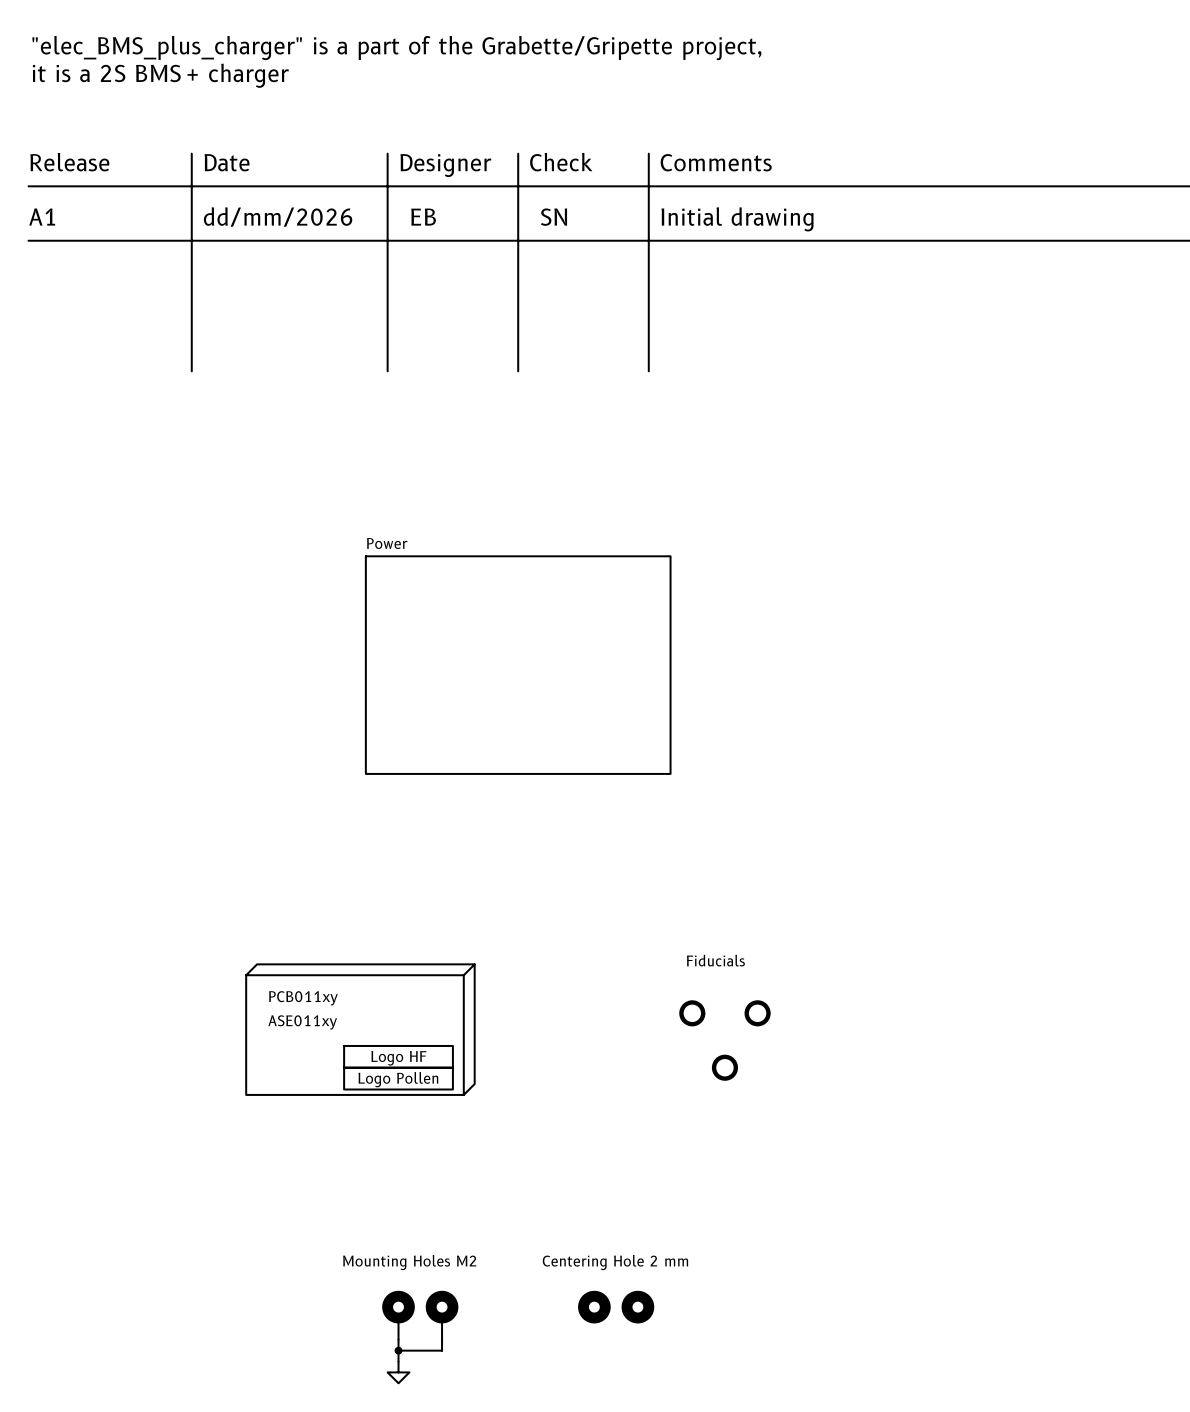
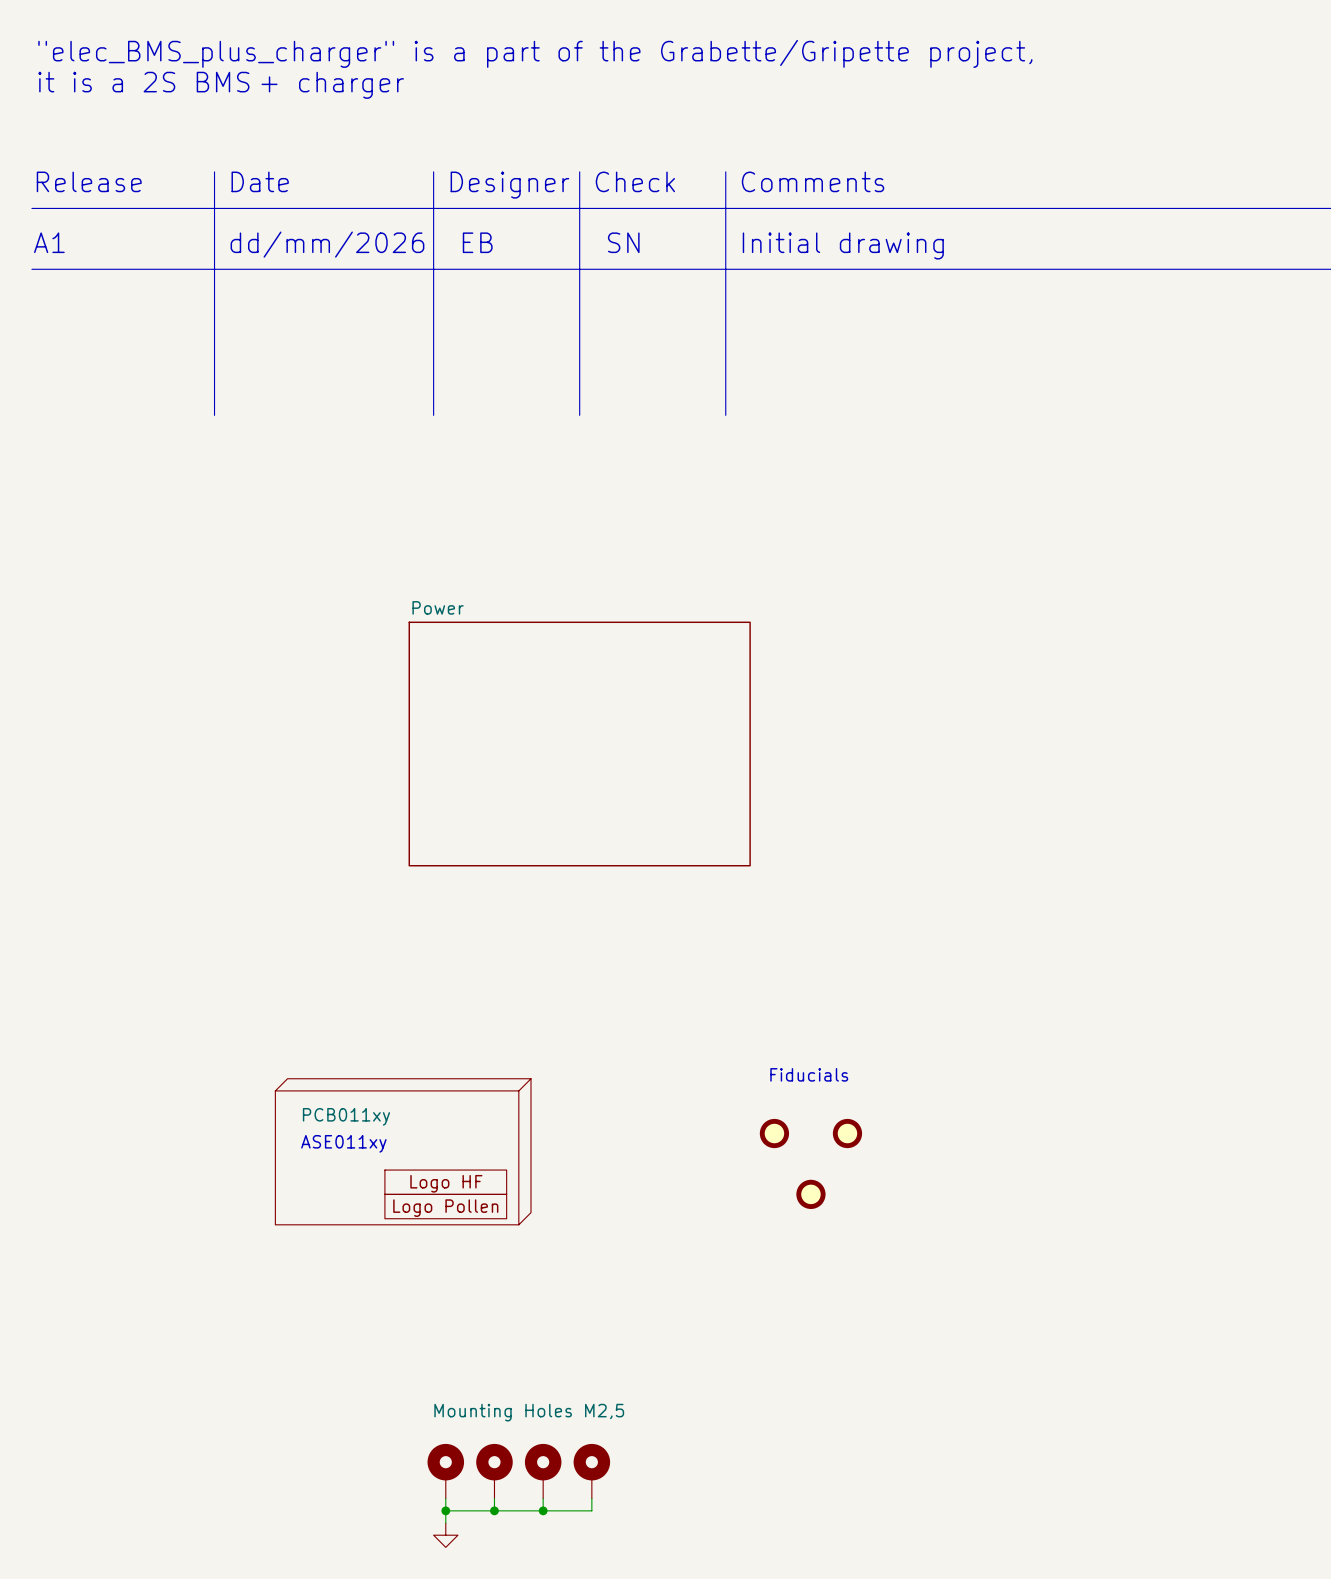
part value: Mounting Holes M2 (409, 1262) -> Mounting Holes M2,5 (529, 1412)
part: Centering Hole 2 mm (594, 1307) -> none
part: (637, 1307) -> none
part: none -> (543, 1471)
part: none -> (591, 1471)
wire: none -> (543, 1498) (543, 1510)
wire: none -> (591, 1498) (591, 1510) (494, 1510)
junction: none -> (494, 1510)
junction: none -> (543, 1510)

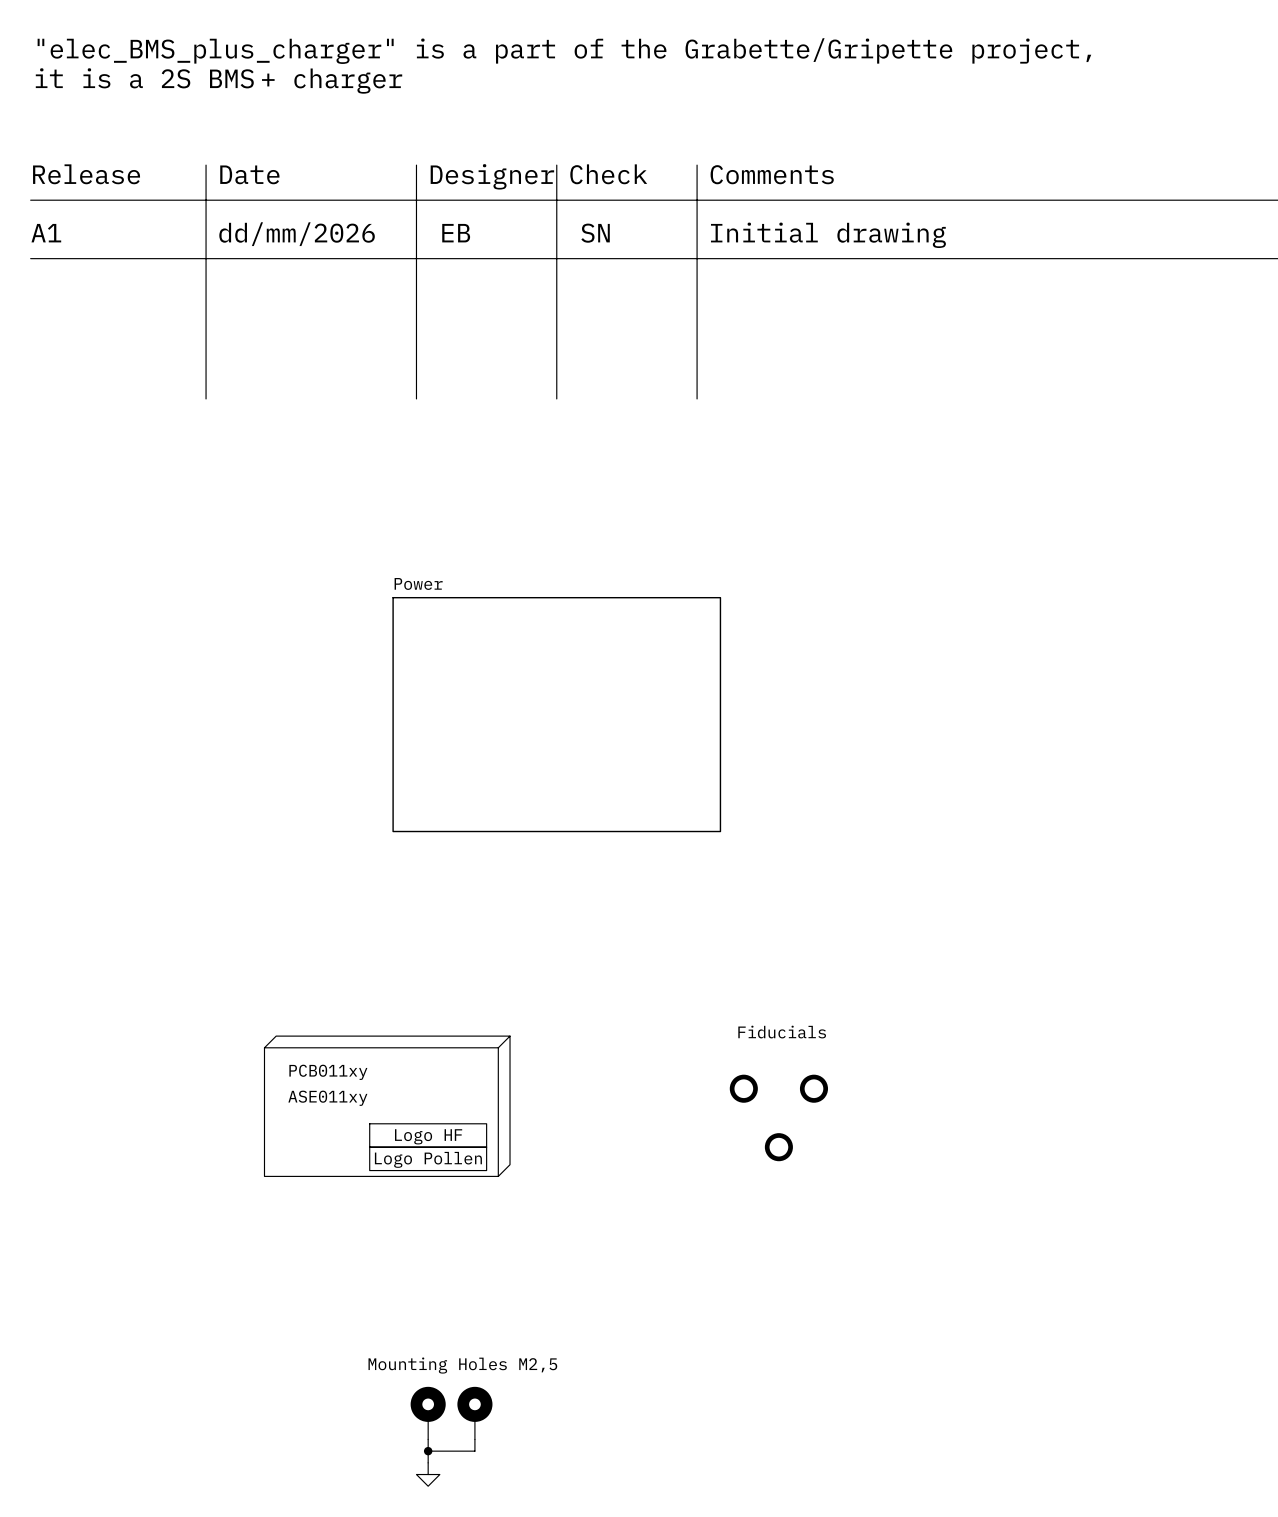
part value position: Mounting Holes M2,5 (529, 1412) -> Mounting Holes M2,5 (462, 1365)
part: (543, 1471) -> none
part: (591, 1471) -> none
wire: (543, 1498) (543, 1510) -> none
wire: (591, 1498) (591, 1510) (494, 1510) -> none
junction: (494, 1510) -> none
junction: (543, 1510) -> none

